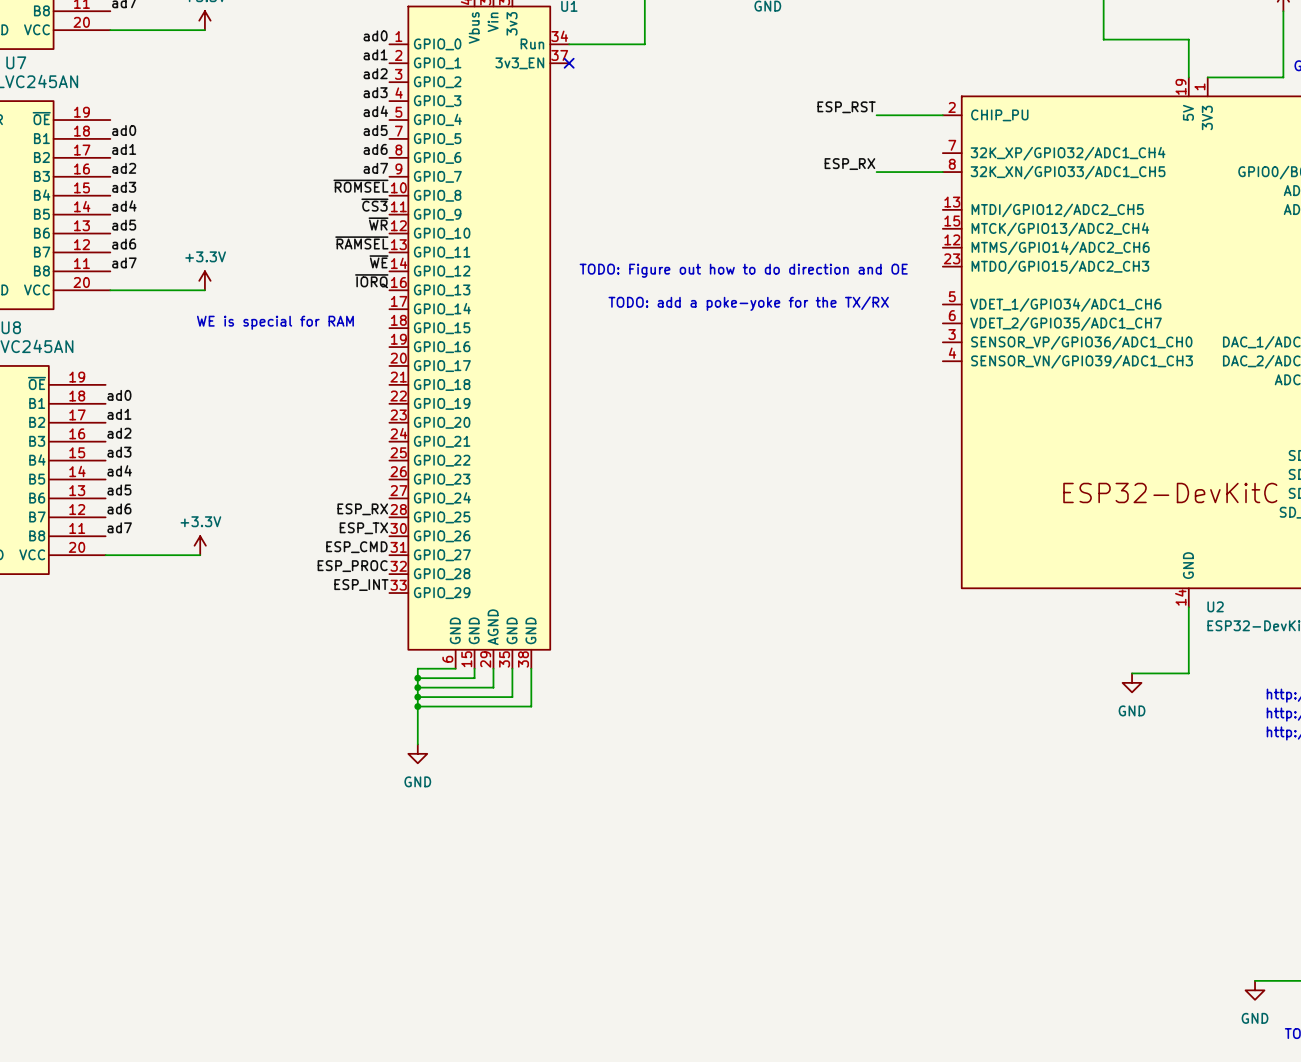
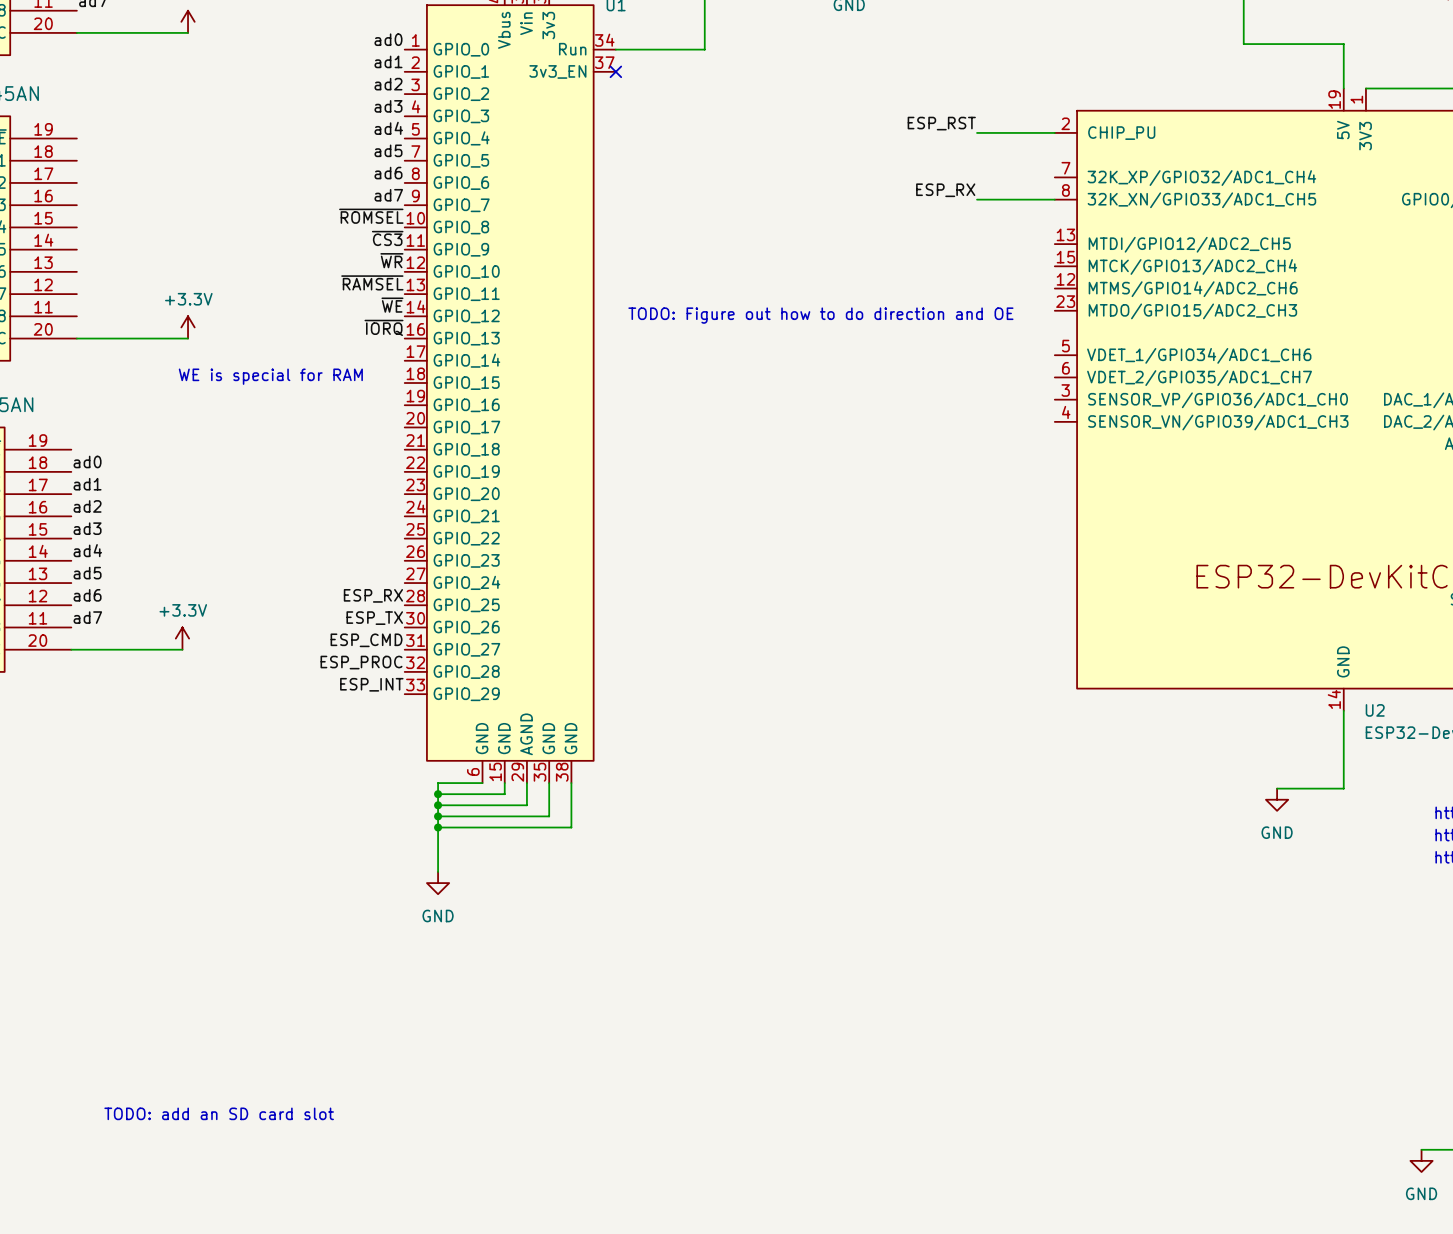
label: ad0 (124, 130) -> none
label: ad1 (124, 149) -> none
label: ad2 (124, 168) -> none
label: ad3 (124, 187) -> none
label: ad4 (124, 205) -> none
label: ad5 (124, 225) -> none
label: ad6 (124, 244) -> none
label: ad7 (124, 262) -> none
text: TODO: add a poke-yoke for the TX/RX (748, 303) -> none
text: none -> TODO: add an SD card slot (219, 1113)

